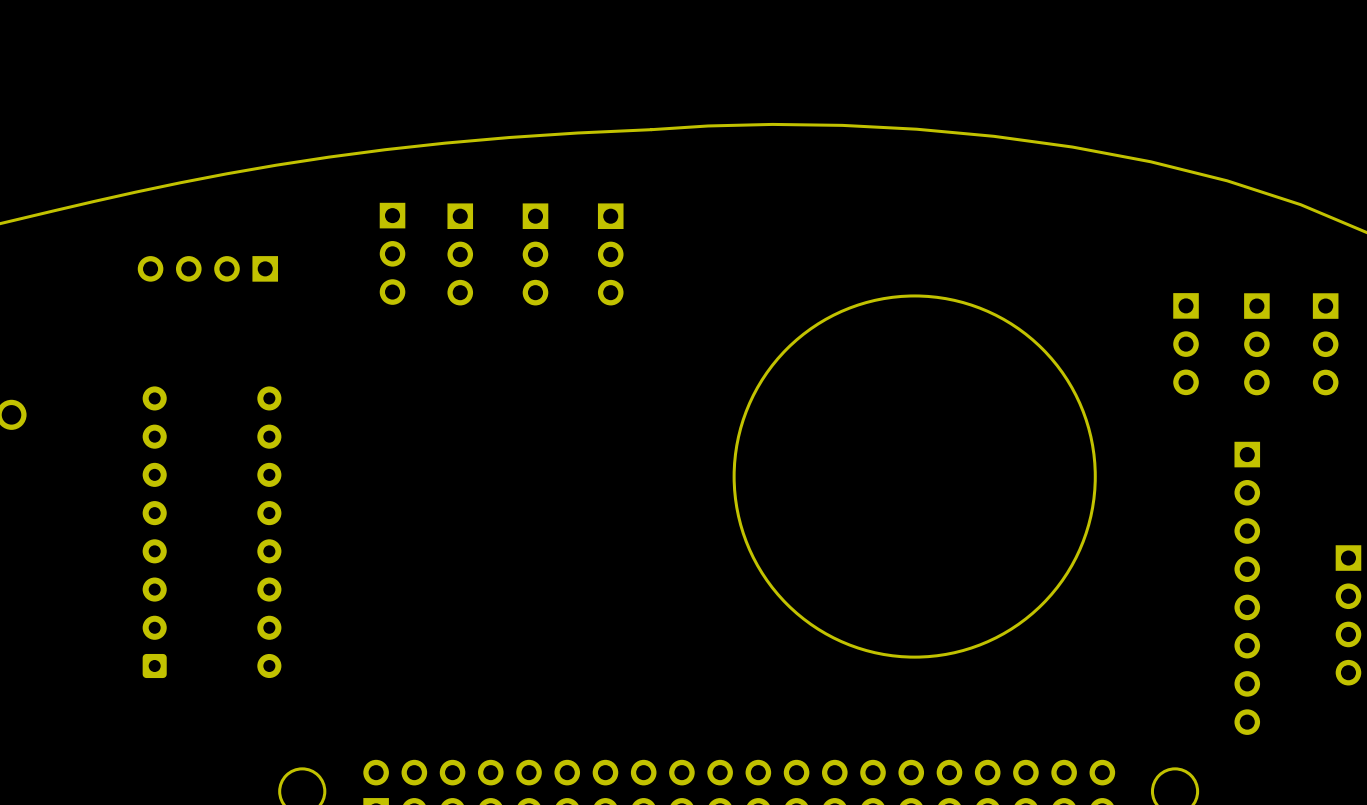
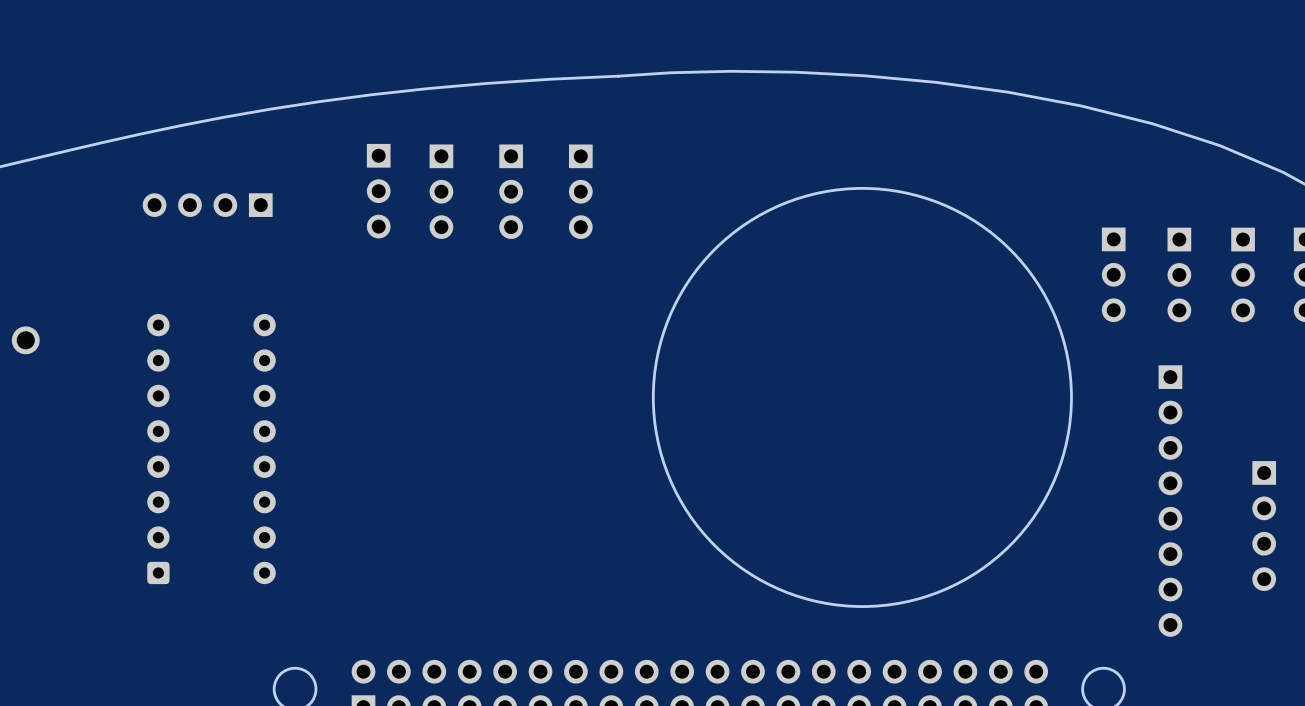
round board edge size: [732, 294, 1097, 659] -> [651, 186, 1073, 608]

